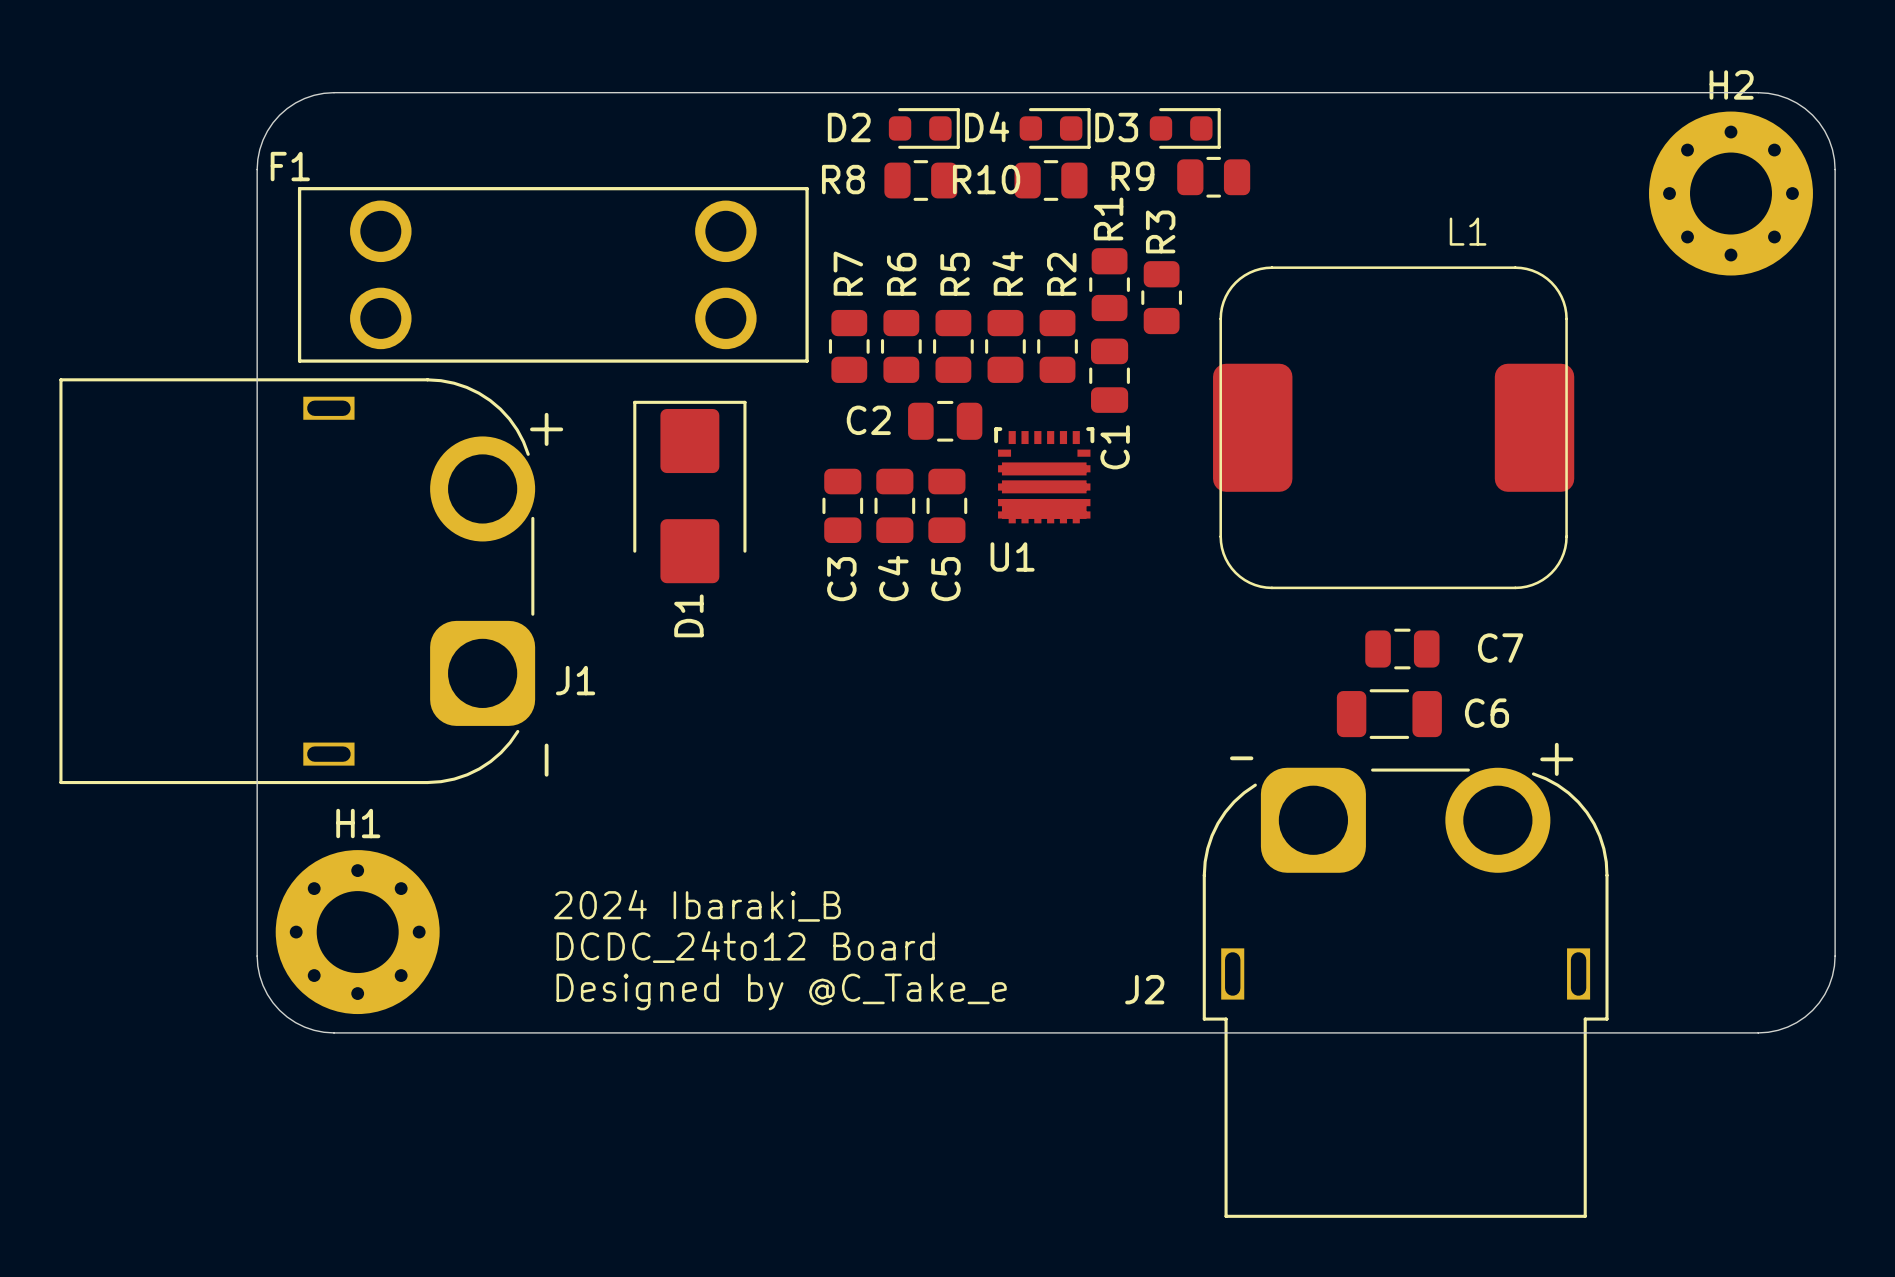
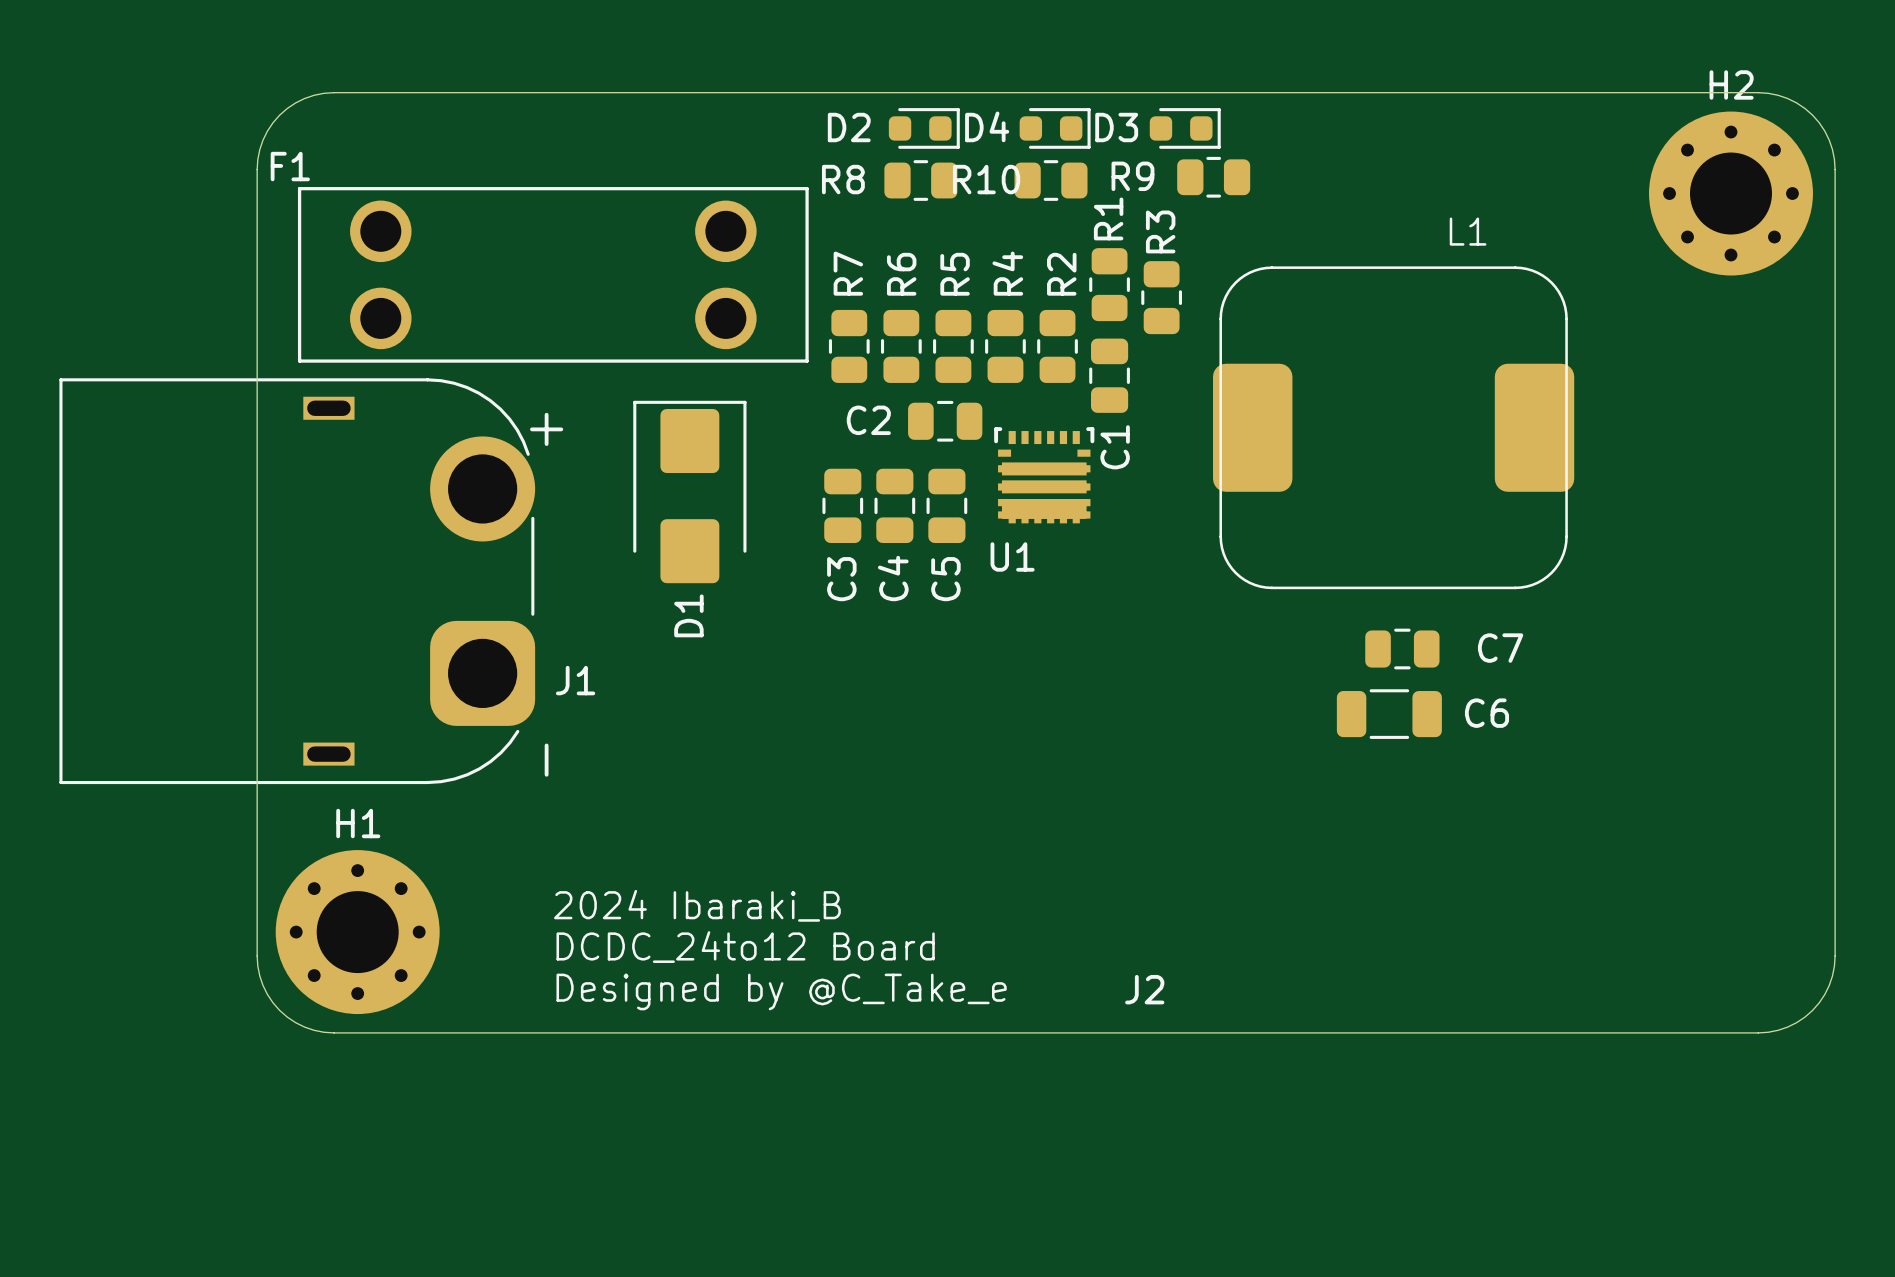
part: (1405, 992) -> none

